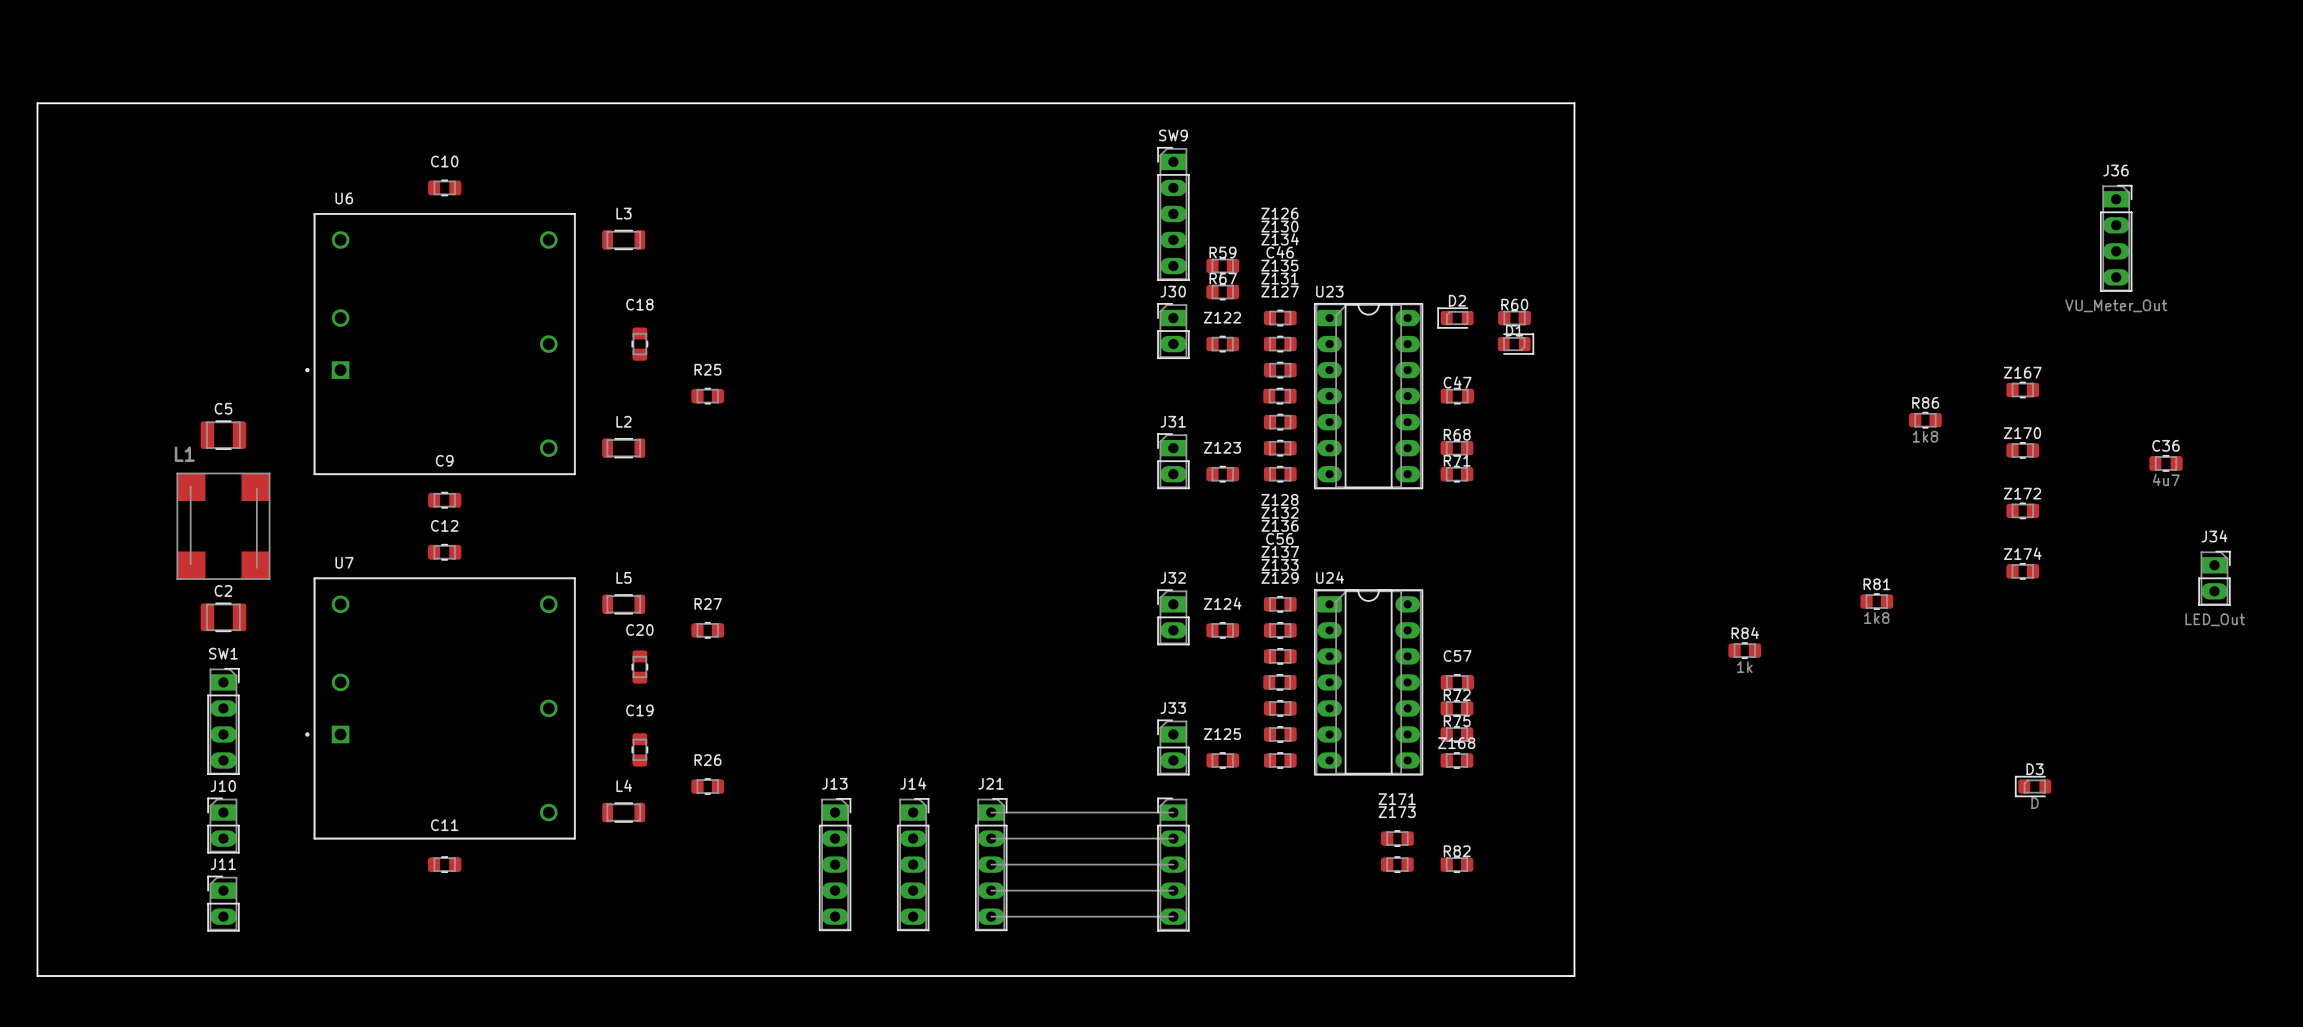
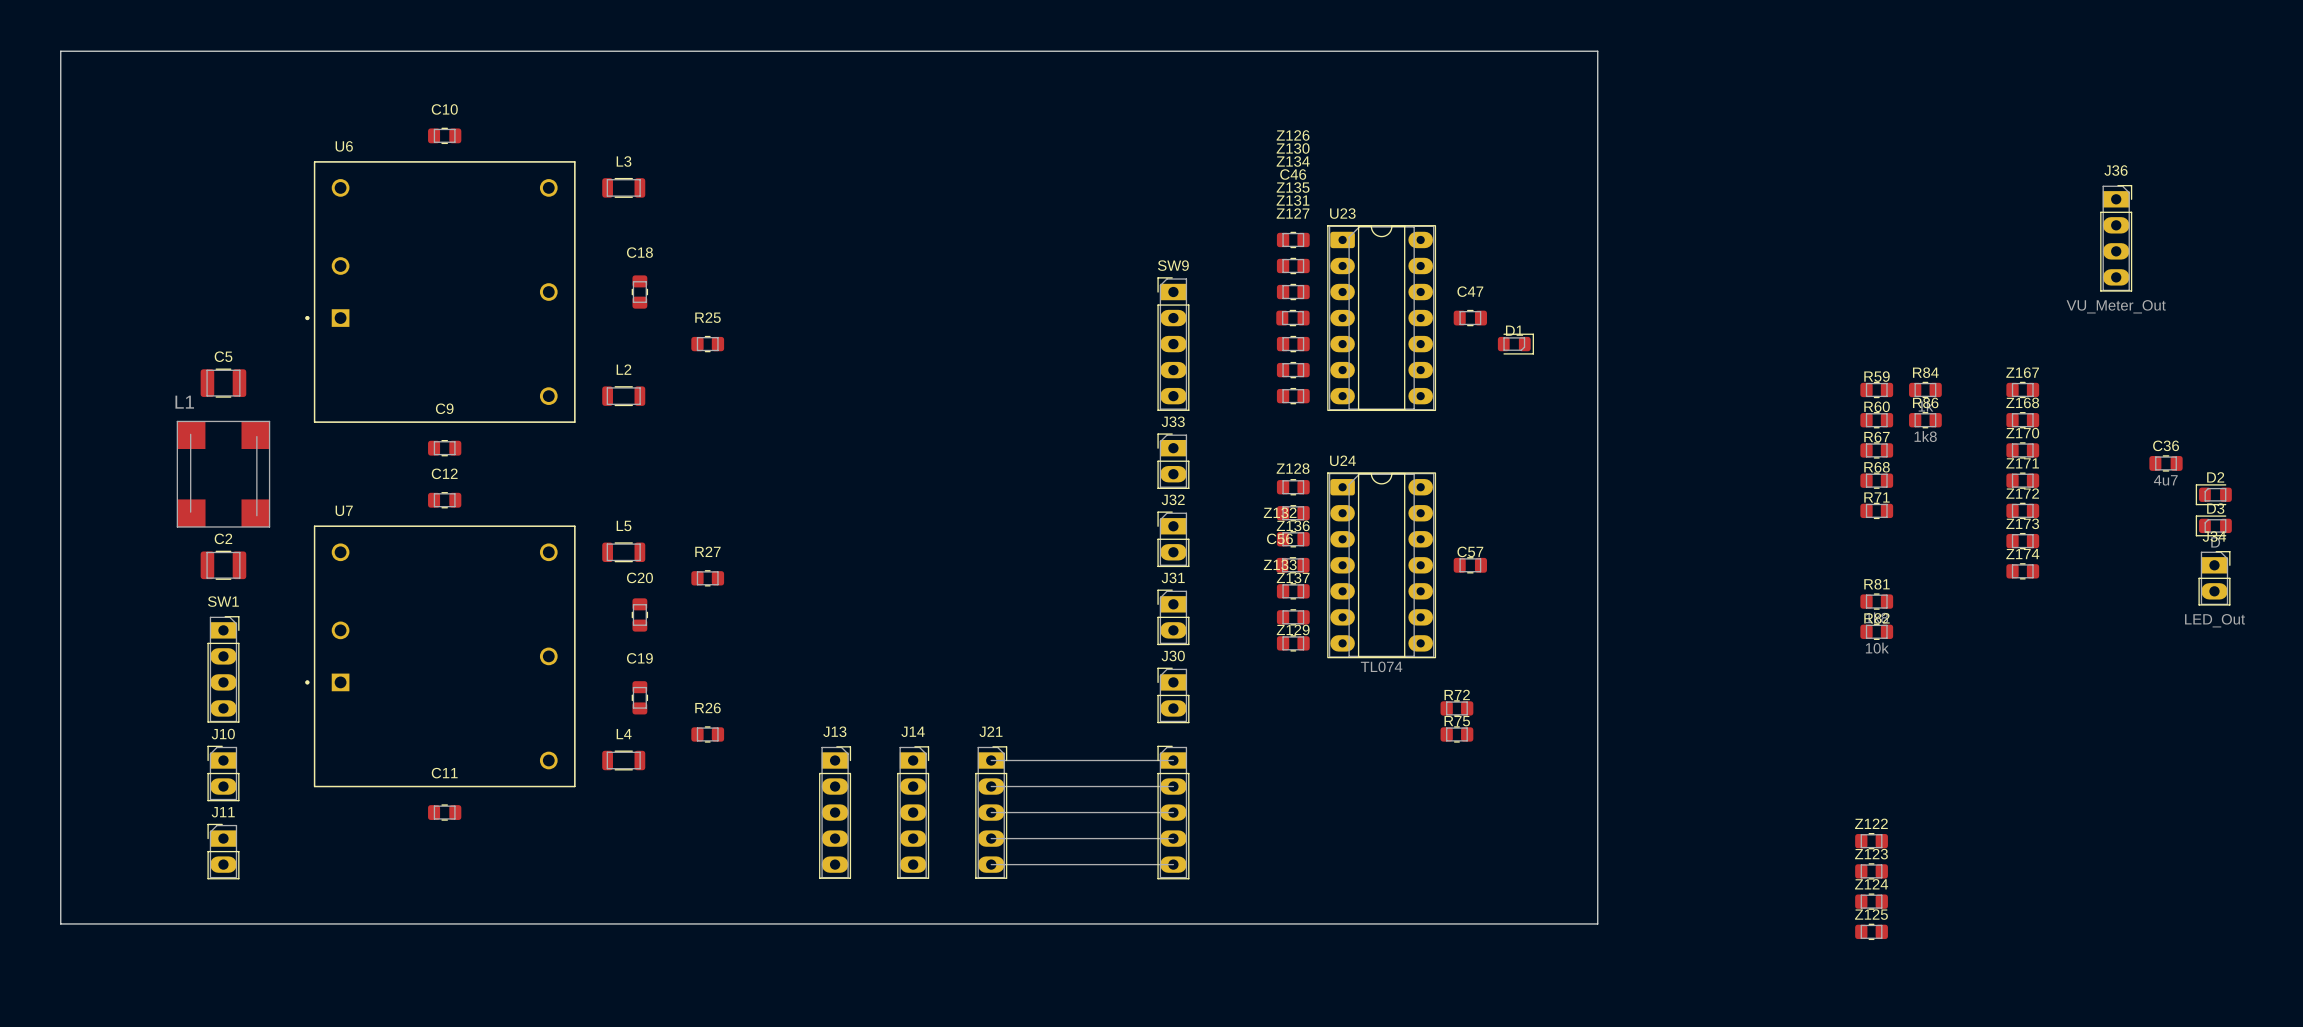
board edge: (37, 103) (1574, 103) (1574, 976) (37, 976) (37, 103) -> (60, 51) (1597, 51) (1597, 923) (60, 923) (60, 51)
C10 position: (444, 187) -> (444, 135)
SW9 position: (1173, 213) -> (1173, 344)
L3 position: (623, 239) -> (623, 187)
R59 position: (1222, 265) -> (1876, 389)
R67 position: (1222, 292) -> (1876, 450)
Z122 name position: Z122 (1222, 317) -> Z122 (1871, 823)
Z126 position: (1280, 318) -> (1293, 239)
D2 position: (1455, 318) -> (2213, 494)
R60 position: (1514, 318) -> (1876, 420)
J30 position: (1173, 331) -> (1173, 695)
U6 position: (440, 344) -> (440, 292)
C18 position: (639, 344) -> (639, 292)
Z122 position: (1222, 344) -> (1871, 841)
Z130 position: (1280, 344) -> (1293, 265)
Z134 position: (1280, 370) -> (1293, 292)
C47 name position: C47 (1457, 382) -> C47 (1470, 291)
R25 position: (707, 396) -> (707, 344)
C46 position: (1279, 396) -> (1292, 318)
U23 position: (1368, 396) -> (1381, 318)
C47 position: (1457, 396) -> (1470, 318)
J31 name: J31 (1173, 421) -> J33 (1173, 421)
Z135 position: (1280, 422) -> (1293, 344)
C5 position: (223, 435) -> (223, 383)
Z123 name position: Z123 (1222, 447) -> Z123 (1871, 854)
C9: none -> (444, 448)
L2 position: (623, 448) -> (623, 396)
Z131 position: (1280, 448) -> (1293, 370)
R68 position: (1456, 448) -> (1876, 480)
C9 name: C9 (444, 460) -> C12 (444, 473)
Z123 position: (1222, 474) -> (1871, 871)
Z127 position: (1280, 474) -> (1293, 396)
R71 position: (1456, 474) -> (1876, 510)
Z128 name position: Z128 (1279, 499) -> Z128 (1293, 468)
Z136 name position: Z136 (1280, 525) -> Z136 (1293, 525)
L1 position: (223, 526) -> (223, 474)
J32: none -> (1173, 539)
Z137 name position: Z137 (1280, 551) -> Z137 (1293, 577)
C12: (444, 552) -> none
J32 name: J32 (1173, 577) -> J31 (1173, 577)
Z129 name position: Z129 (1280, 577) -> Z129 (1293, 629)
Z124 name position: Z124 (1222, 603) -> Z124 (1871, 884)
L5 position: (623, 604) -> (623, 552)
Z128 position: (1280, 604) -> (1293, 487)
C2 position: (223, 617) -> (223, 565)
R27 position: (707, 630) -> (707, 578)
Z124 position: (1222, 630) -> (1871, 901)
Z132 position: (1280, 630) -> (1293, 513)
R82 value: none -> 10k (1877, 648)
R84 position: (1744, 650) -> (1925, 389)
Z136 position: (1280, 656) -> (1293, 539)
C57 name position: C57 (1457, 656) -> C57 (1470, 551)
U24 value: none -> TL074 (1381, 666)
C20 position: (639, 667) -> (639, 614)
C56 position: (1279, 682) -> (1292, 565)
U24 position: (1368, 682) -> (1381, 565)
C57 position: (1457, 682) -> (1470, 565)
U7 position: (440, 708) -> (440, 656)
Z137 position: (1280, 708) -> (1293, 591)
SW1 position: (223, 721) -> (223, 669)
Z125 name position: Z125 (1222, 734) -> Z125 (1871, 914)
Z133 position: (1280, 734) -> (1293, 617)
J33: (1173, 747) -> none
C19 position: (639, 749) -> (639, 697)
Z125 position: (1222, 760) -> (1871, 931)
Z129 position: (1280, 760) -> (1293, 643)
Z168 position: (1456, 760) -> (2022, 420)
R26 position: (707, 786) -> (707, 734)
D3 position: (2033, 786) -> (2213, 525)
Z171 name position: Z171 (1397, 799) -> Z171 (2022, 463)
L4 position: (623, 812) -> (623, 760)
Z173 name position: Z173 (1397, 812) -> Z173 (2022, 523)
J10 position: (223, 825) -> (223, 773)
Z171 position: (1397, 838) -> (2022, 480)
C11 position: (444, 864) -> (444, 812)
J13 position: (835, 864) -> (835, 812)
J14 position: (913, 864) -> (913, 812)
J21 position: (1082, 864) -> (1082, 812)
Z173 position: (1397, 864) -> (2022, 541)
R82 position: (1456, 864) -> (1876, 631)
J11 position: (223, 903) -> (223, 851)

